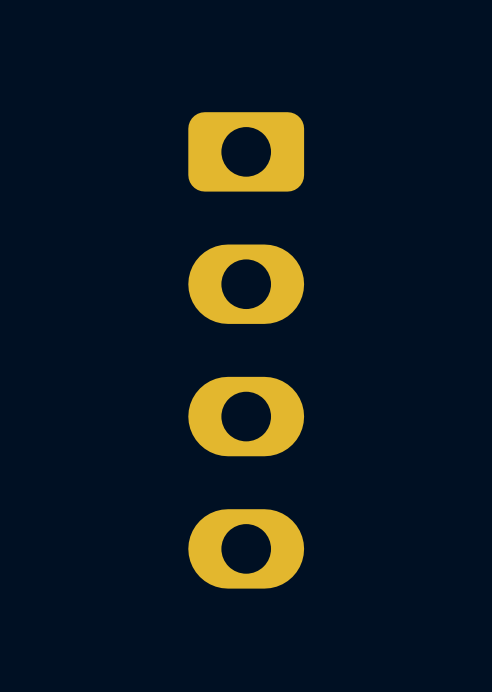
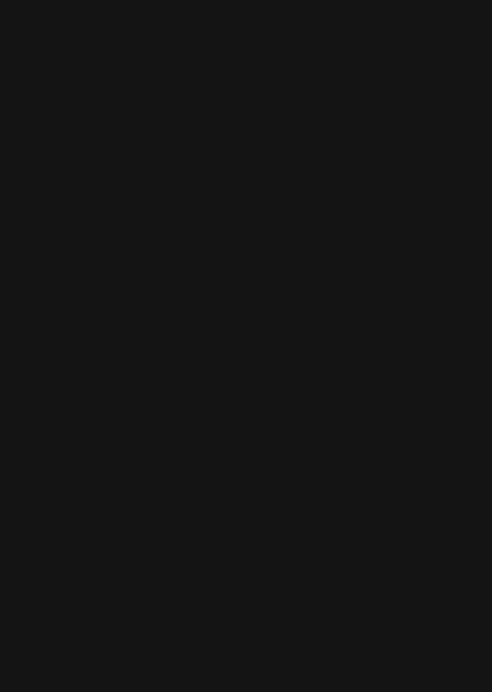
part: (246, 350) -> none

